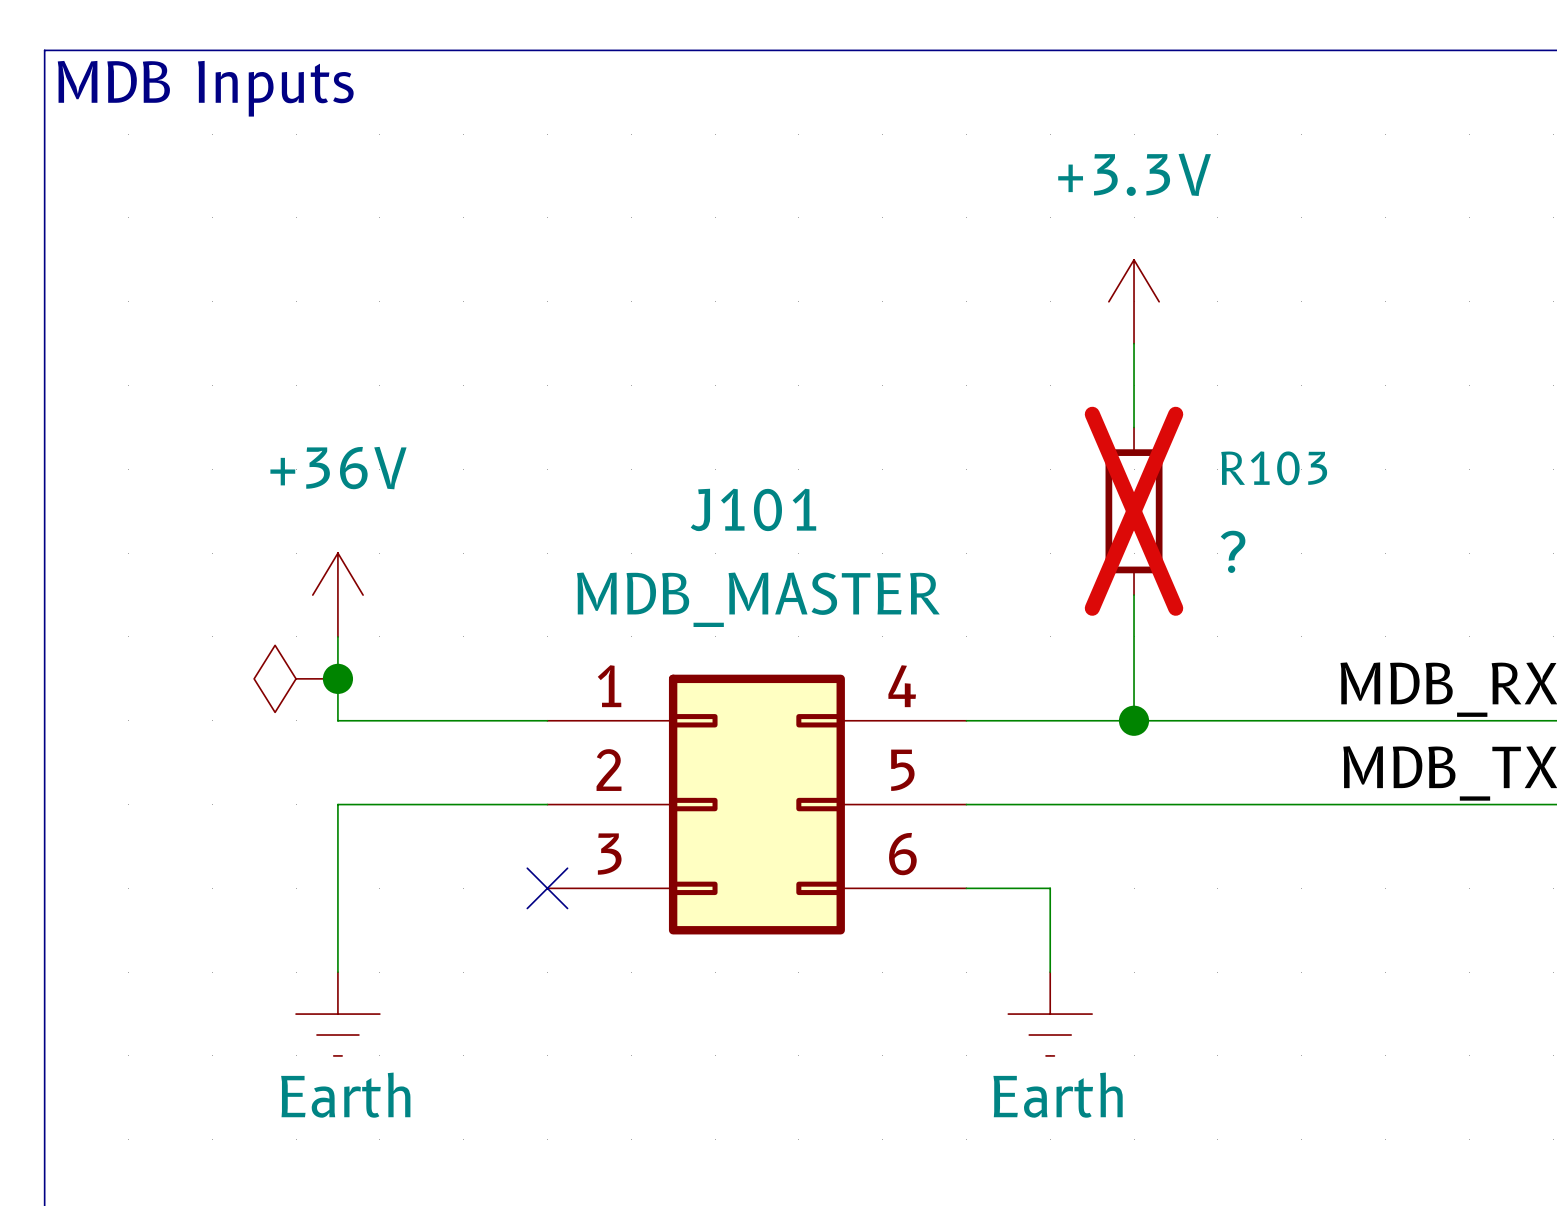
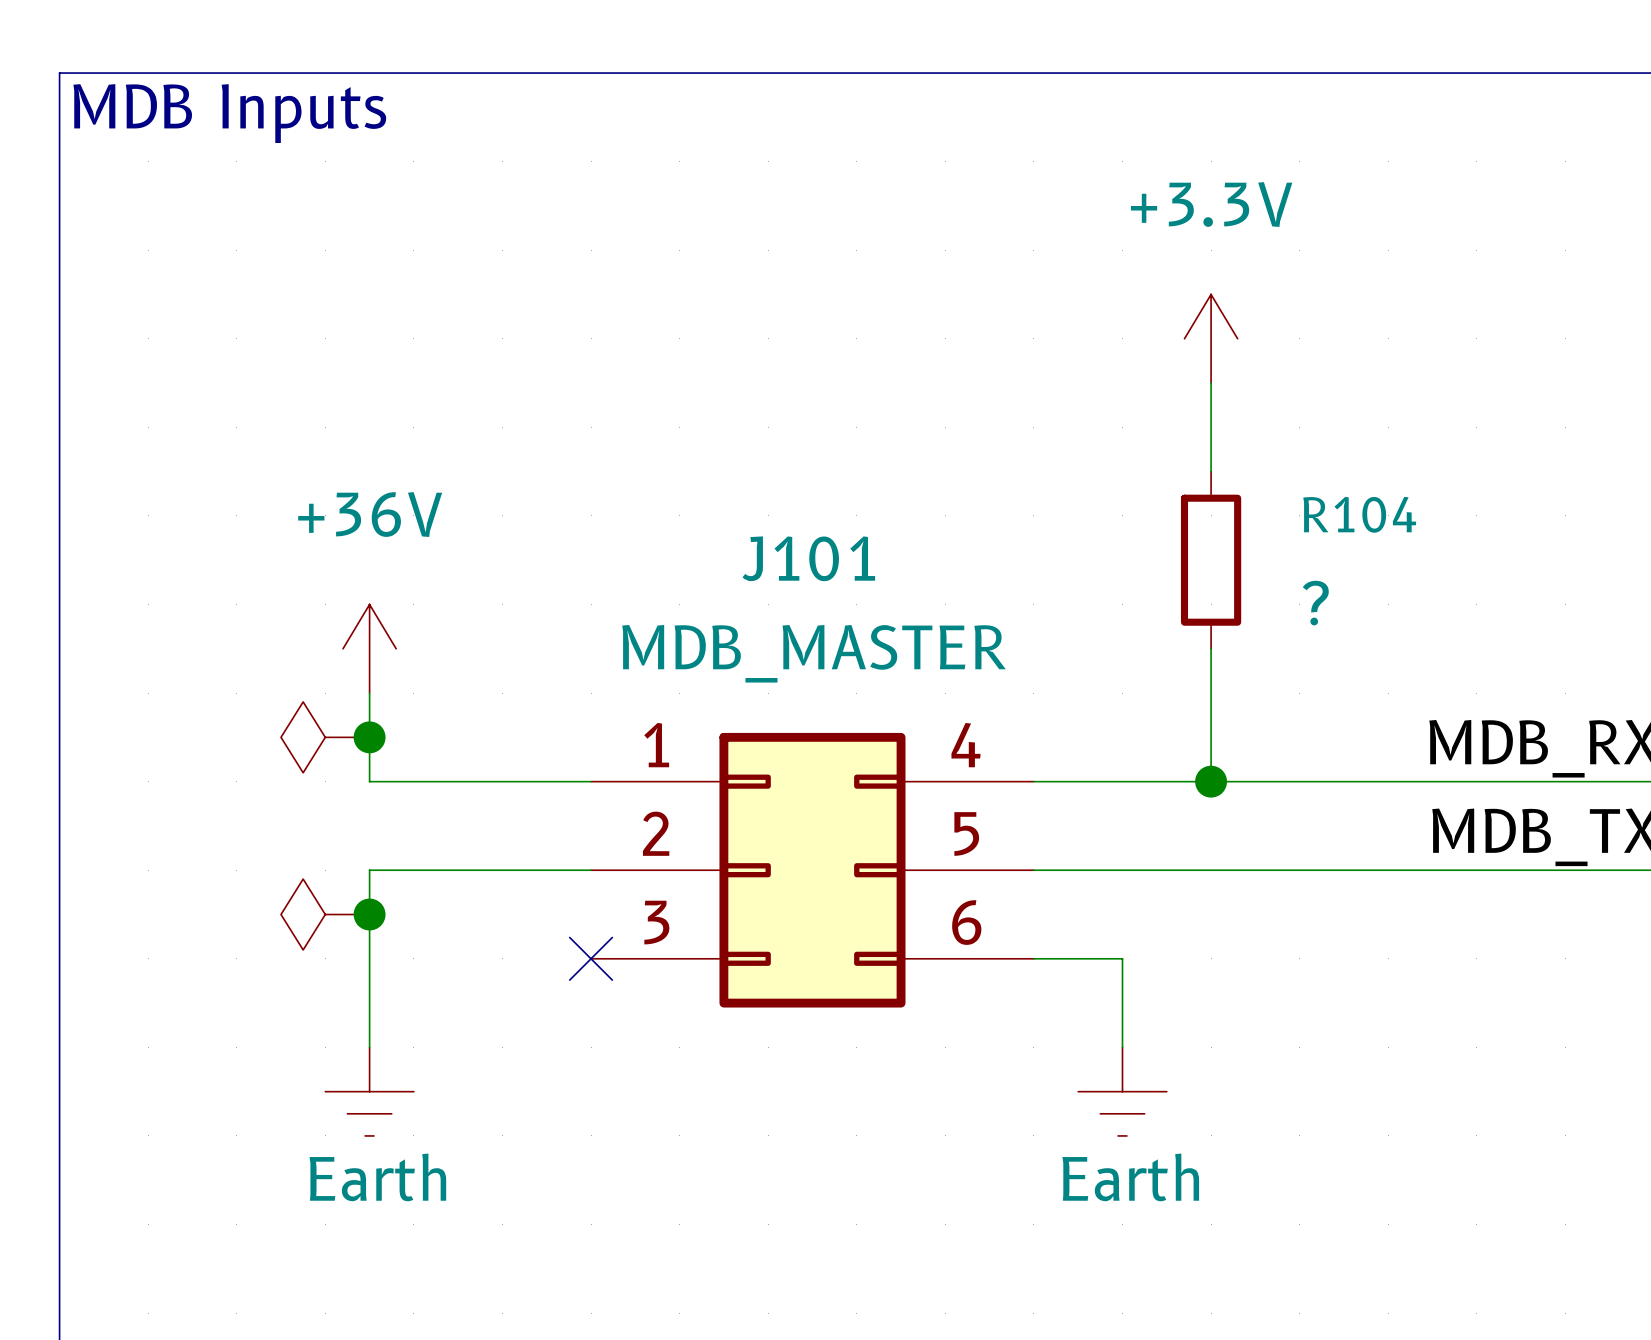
R103 name: R103 (1274, 468) -> R104 (1359, 514)
R103 do-not-place cross: (1134, 511) -> none
power symbol: none -> (325, 914)
junction: none -> (369, 914)

